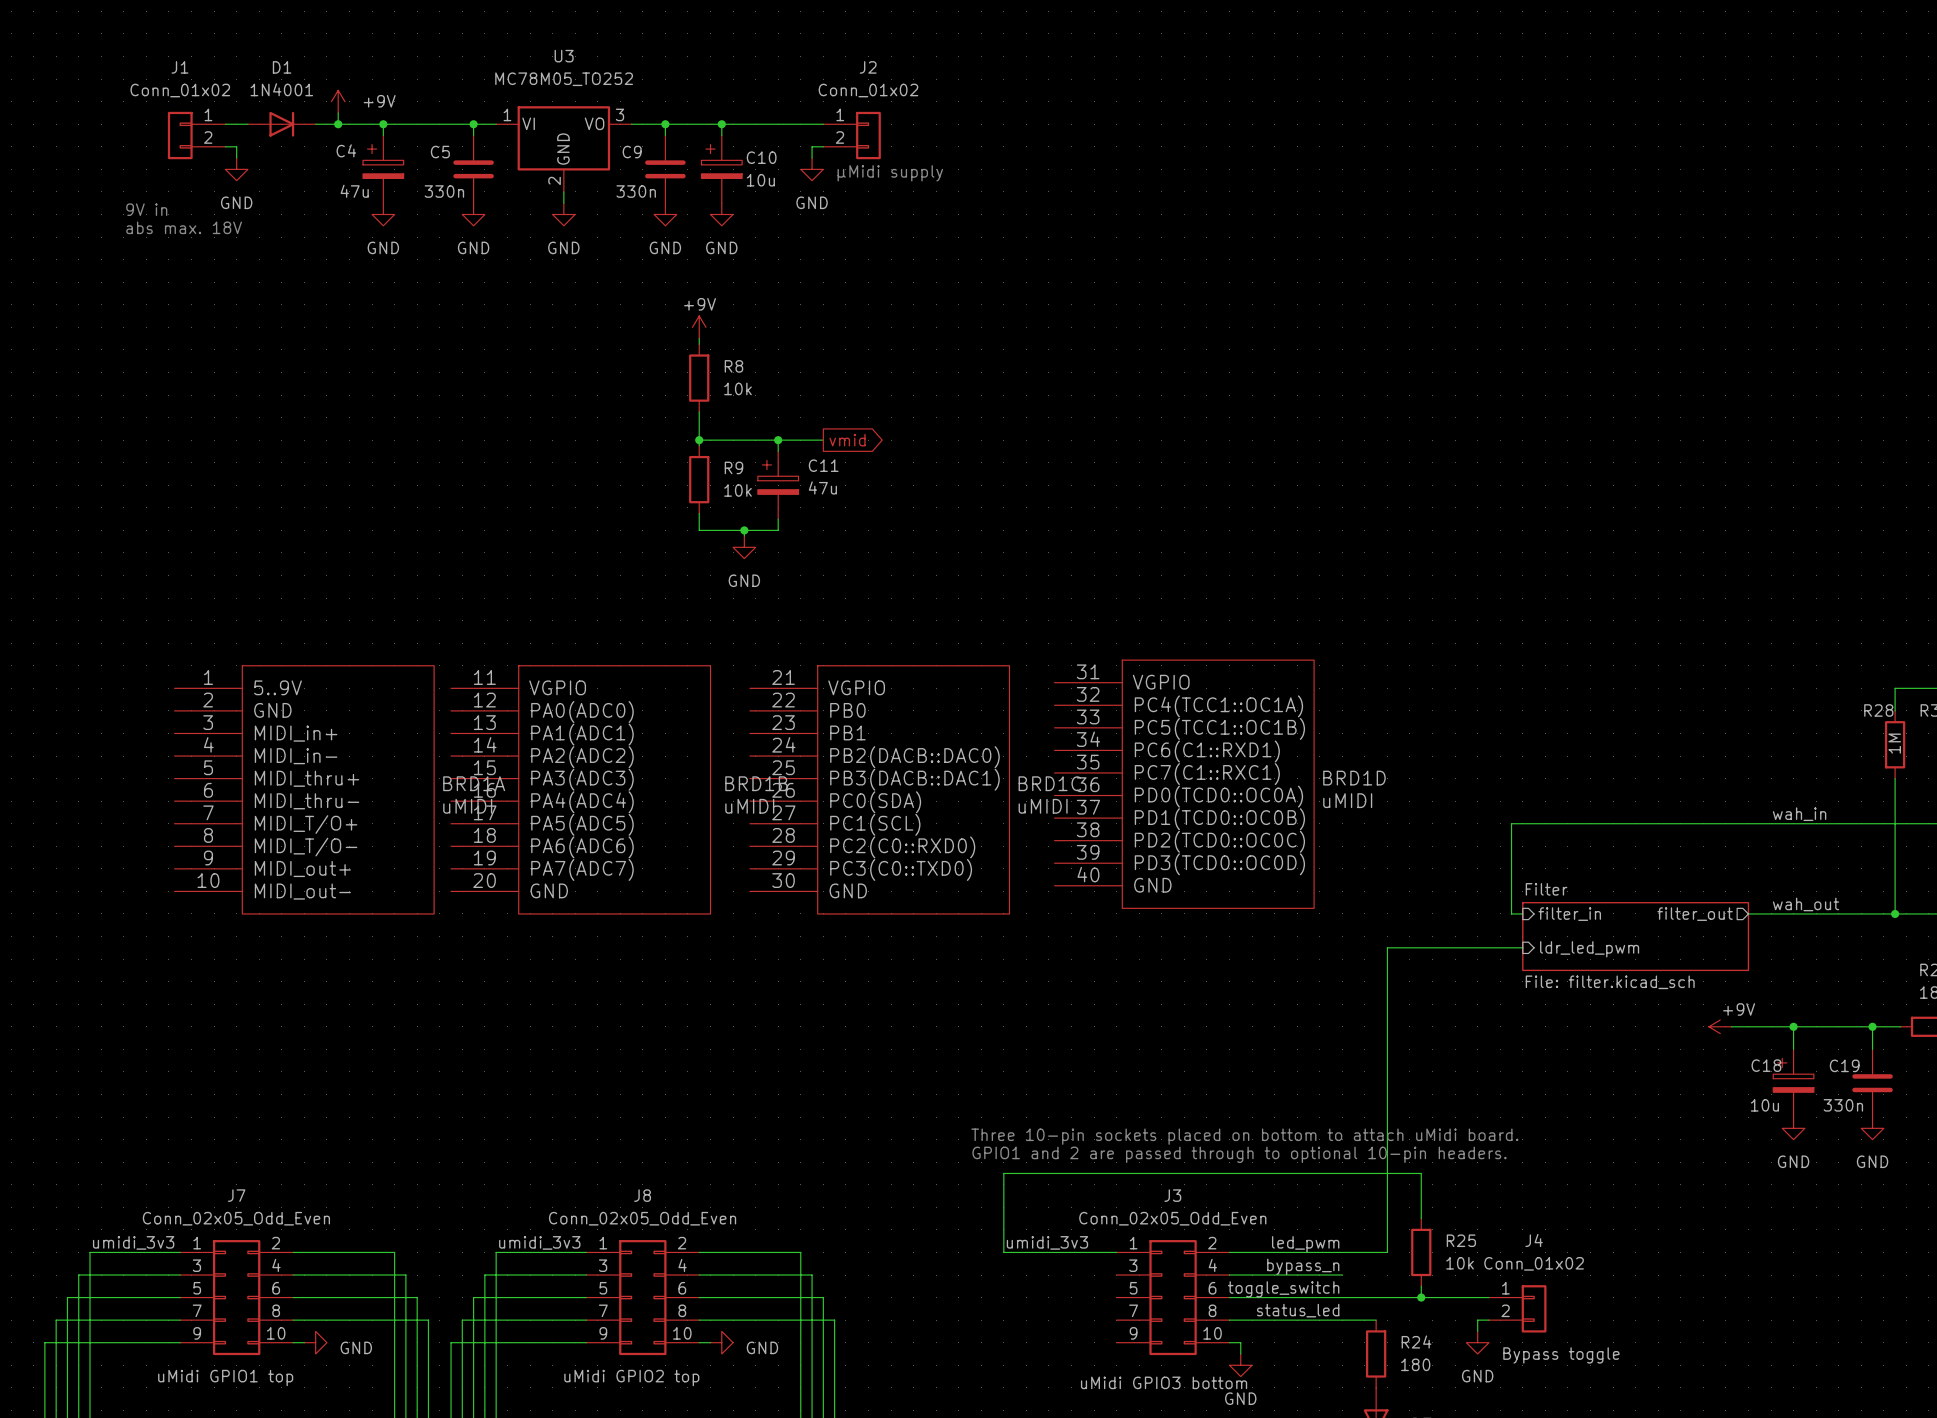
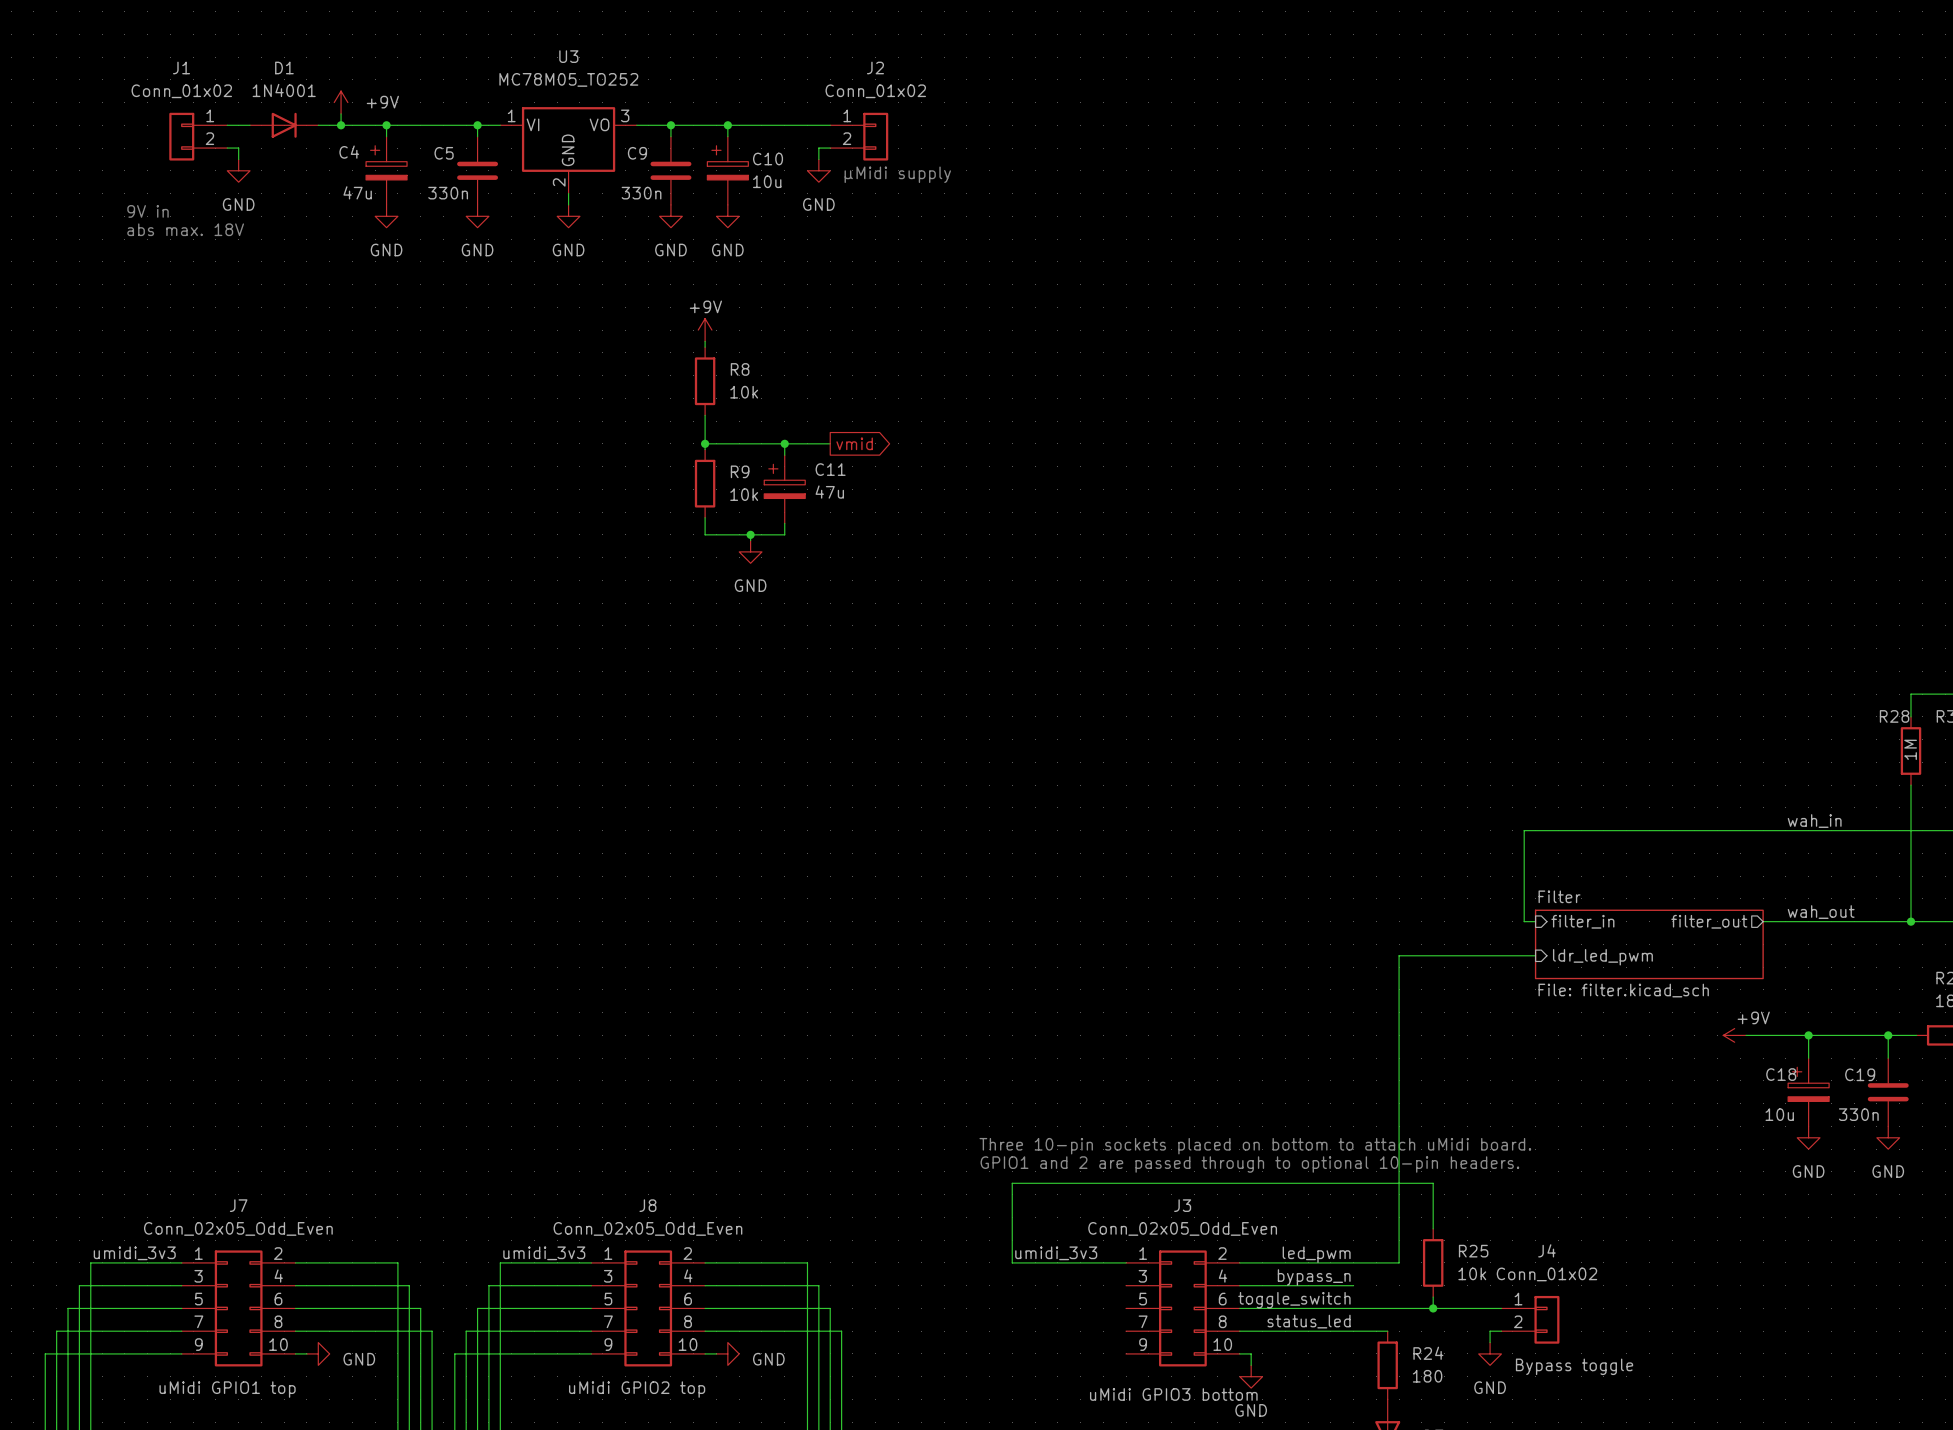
BRD1D: uMIDI (1184, 784) -> none
BRD1A: uMIDI (304, 789) -> none
BRD1B: uMIDI (580, 789) -> none
BRD1C: uMIDI (879, 789) -> none

